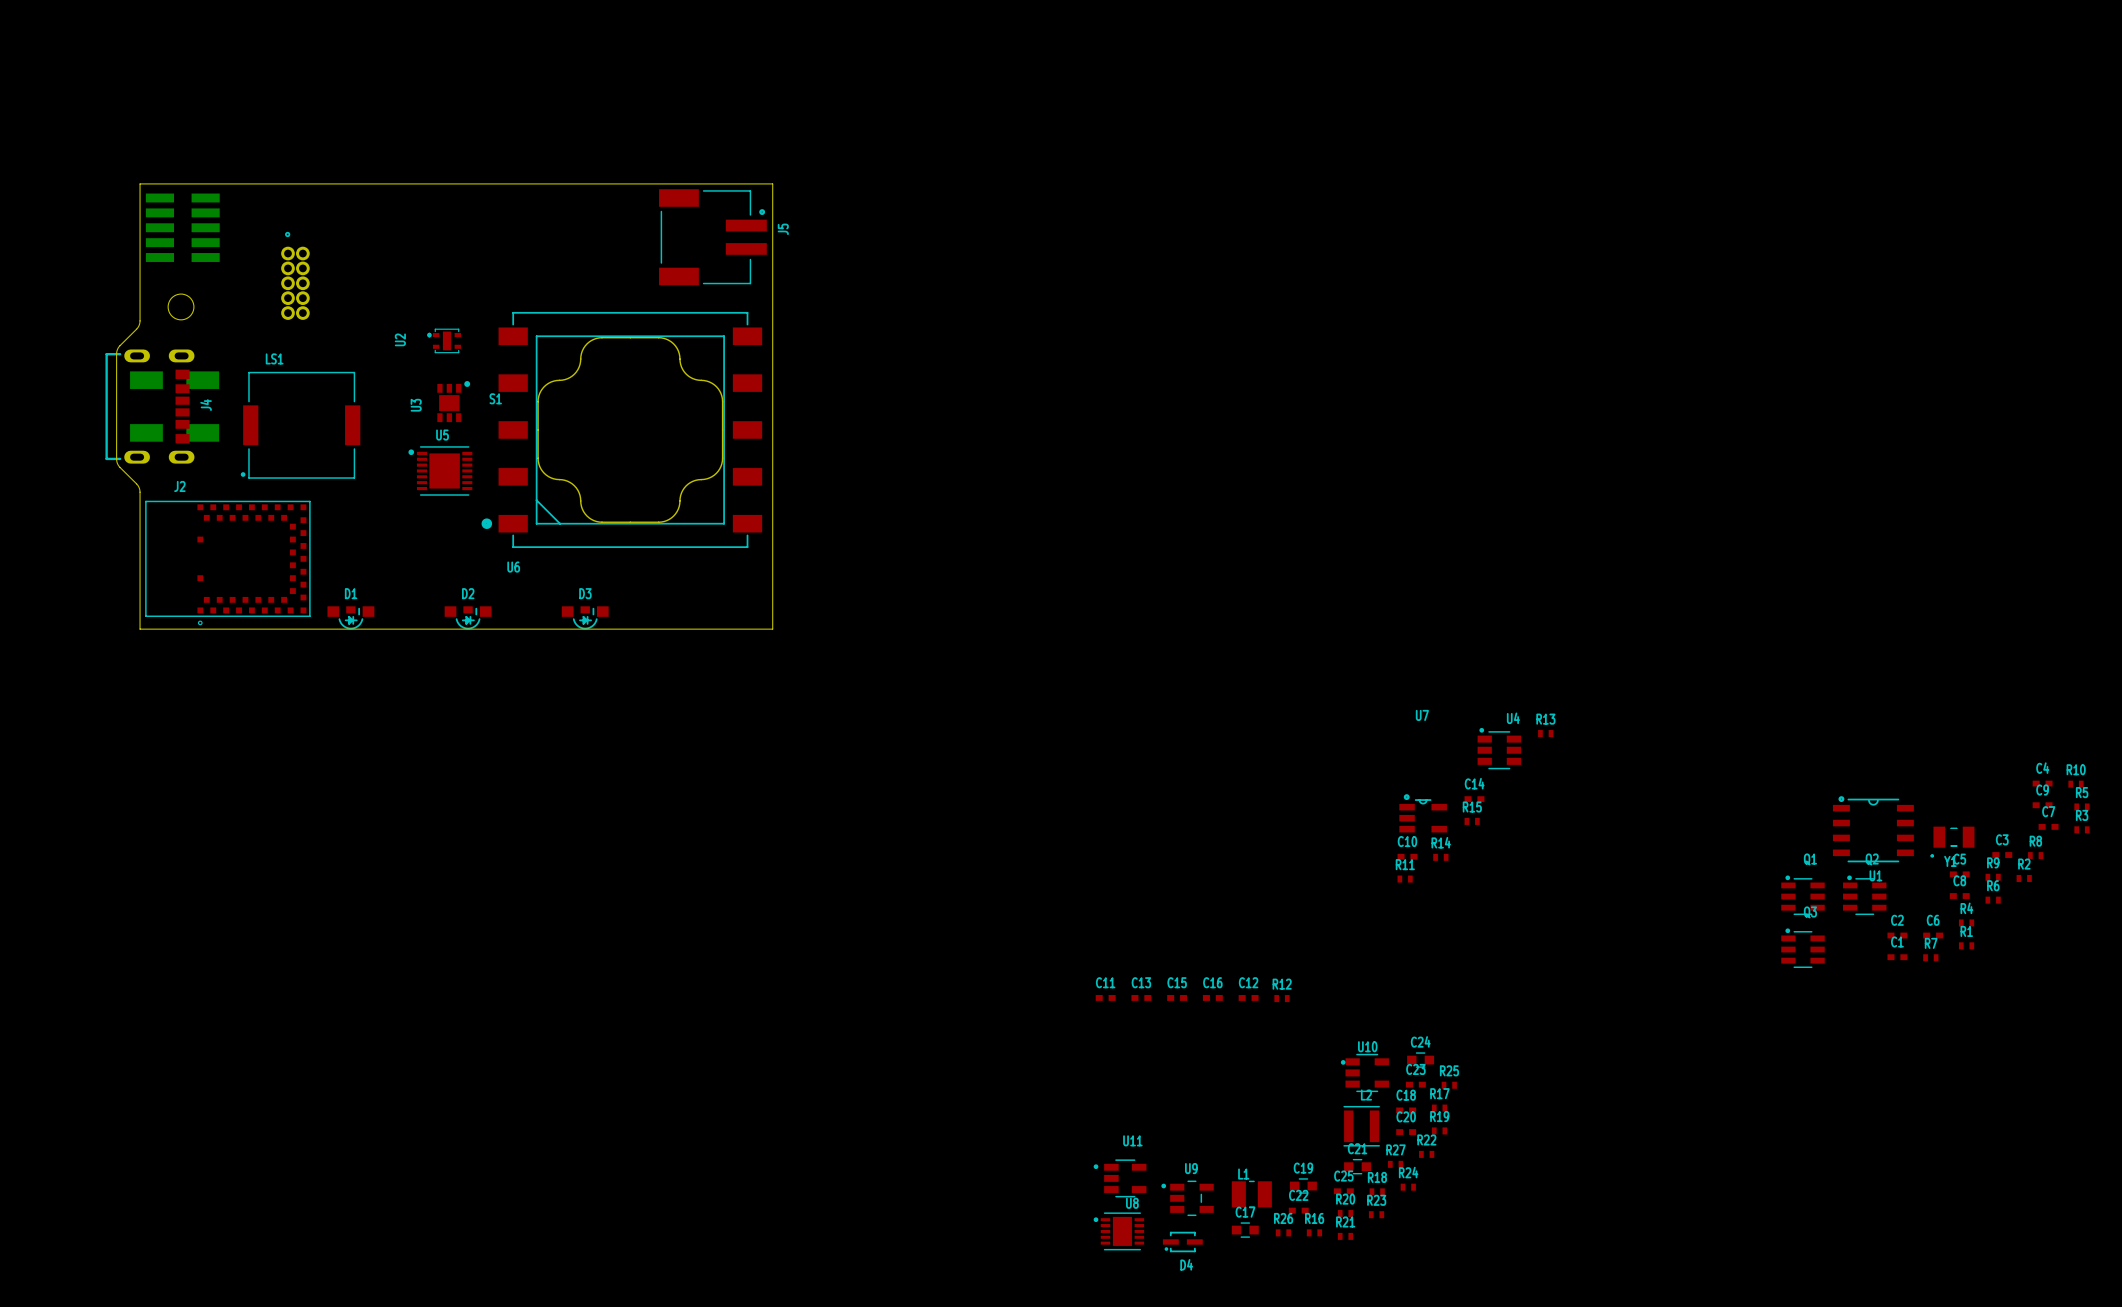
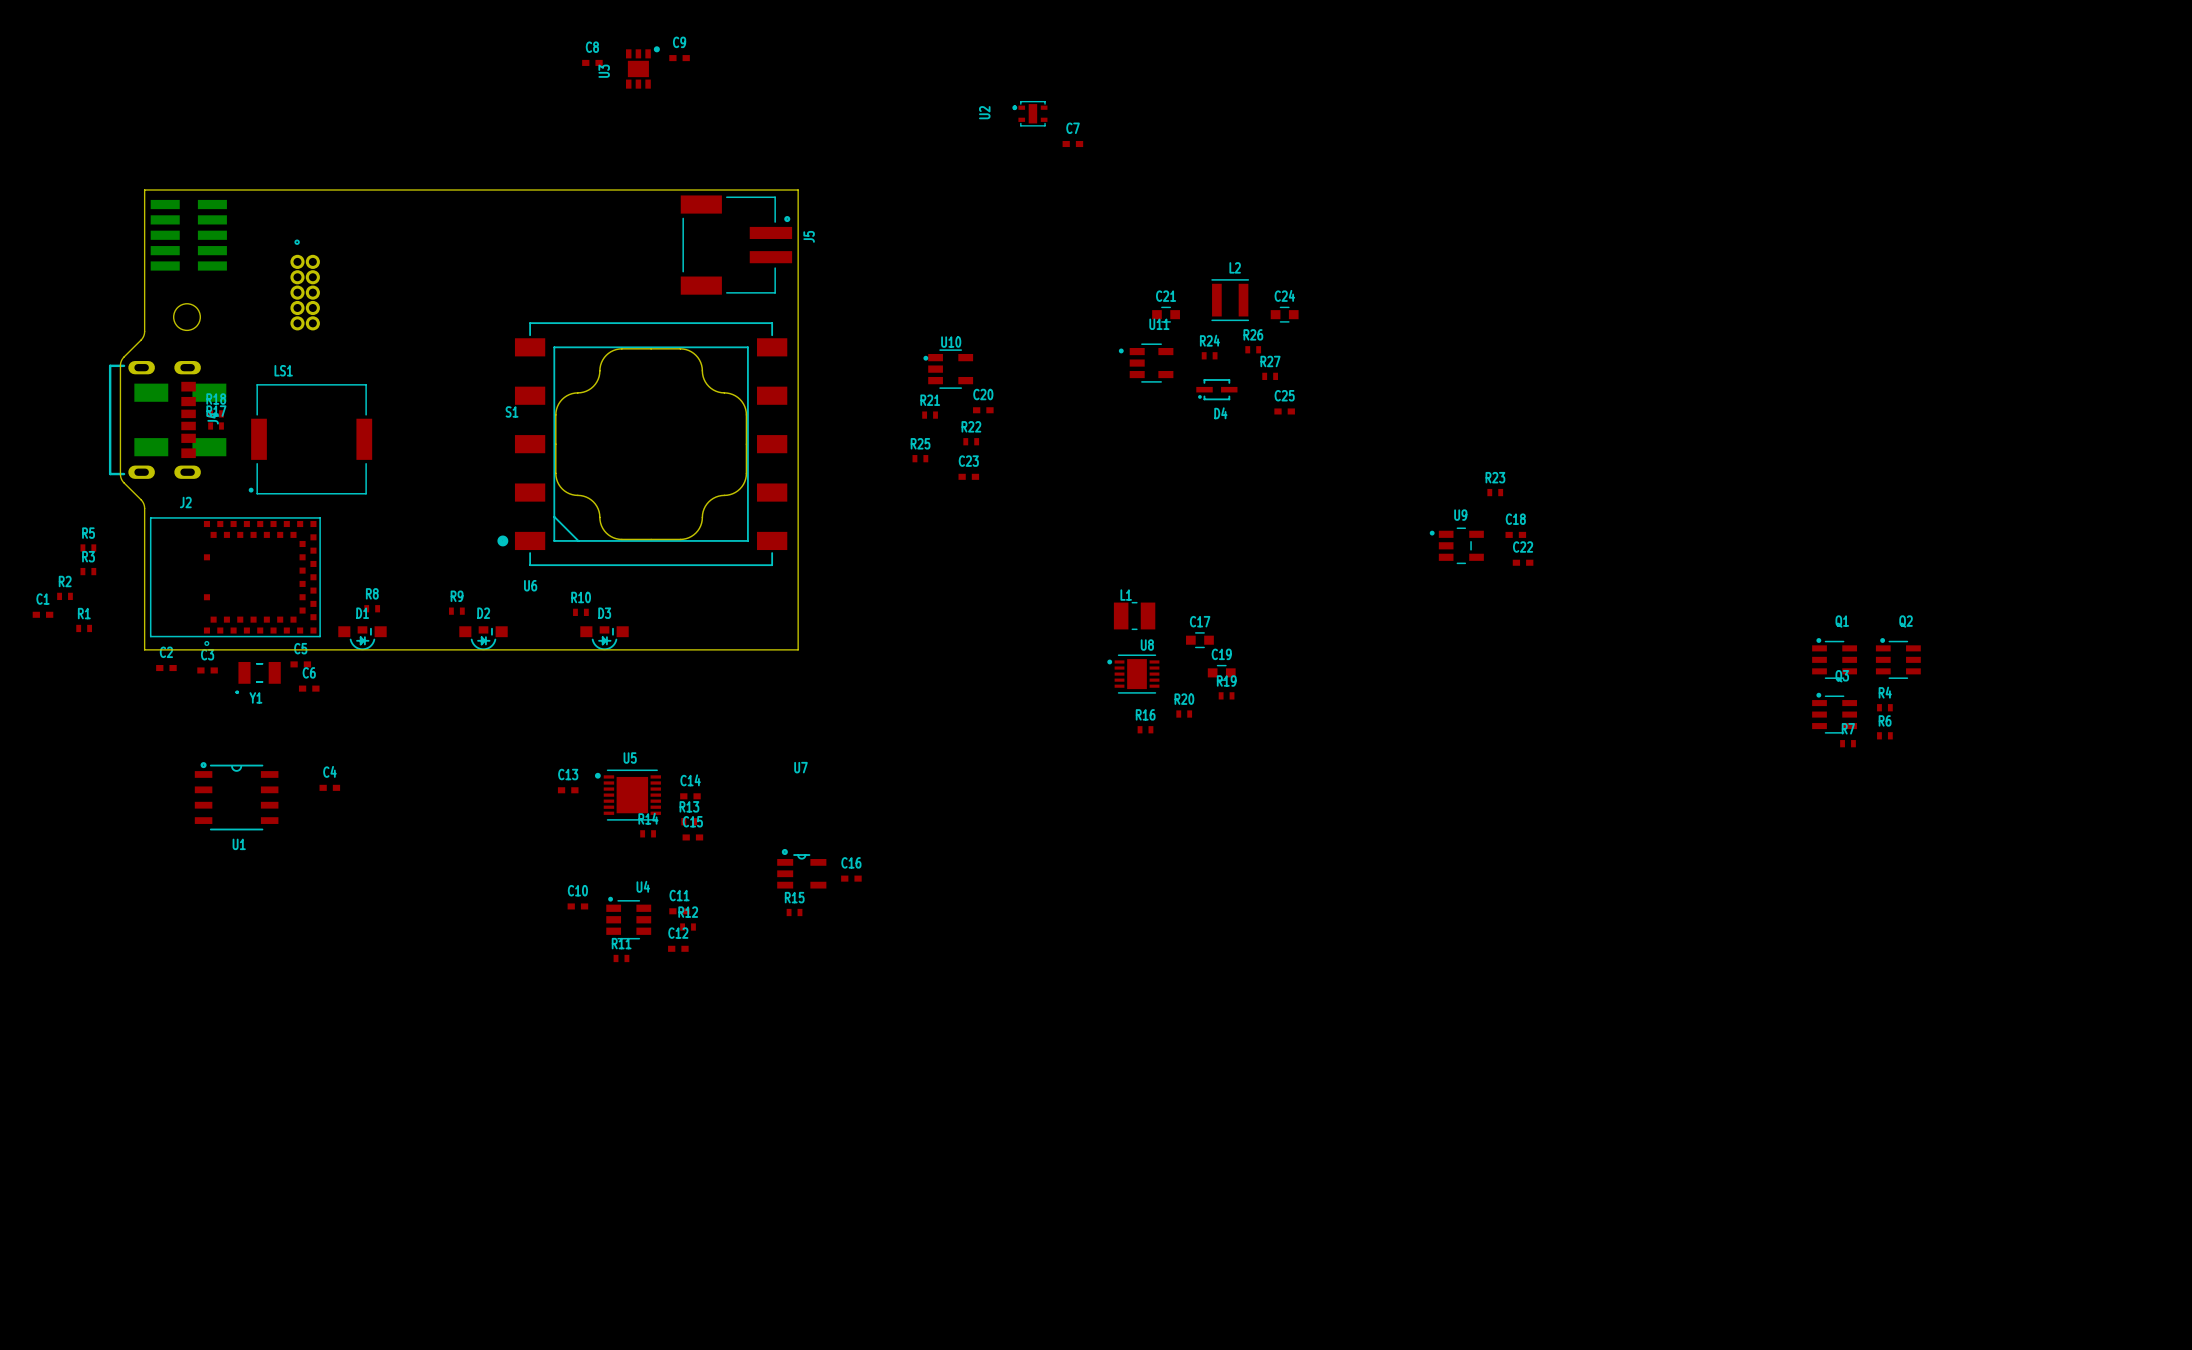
U2 position: (444, 340) -> (1029, 113)
U3 position: (453, 401) -> (642, 67)
U5 position: (440, 470) -> (627, 795)
R13 position: (1545, 733) -> (689, 821)
U4 position: (1499, 748) -> (628, 918)
C4 position: (2042, 783) -> (329, 787)
R10 position: (2075, 784) -> (580, 612)
C14 position: (1474, 799) -> (690, 796)
C9 position: (2042, 805) -> (679, 58)
R5 position: (2081, 806) -> (88, 547)
U7 position: (1423, 813) -> (801, 868)
R15 position: (1472, 821) -> (794, 912)
C7 position: (2048, 826) -> (1072, 144)
U1 position: (1873, 829) -> (236, 796)
R3 position: (2081, 829) -> (88, 571)
Y1 position: (1952, 842) -> (258, 678)
C3 position: (2002, 855) -> (207, 670)
R8 position: (2035, 855) -> (372, 608)
C10 position: (1407, 856) -> (577, 906)
R14 position: (1440, 857) -> (648, 833)
C5 position: (1959, 874) -> (300, 664)
R9 position: (1993, 877) -> (456, 611)
R2 position: (2024, 878) -> (65, 596)
R11 position: (1405, 879) -> (621, 958)
Q1 position: (1803, 895) -> (1834, 658)
Q2 position: (1864, 895) -> (1898, 658)
C8 position: (1959, 896) -> (592, 62)
R6 position: (1993, 900) -> (1884, 735)
R4 position: (1966, 922) -> (1884, 707)
C2 position: (1897, 935) -> (166, 668)
C6 position: (1933, 935) -> (309, 688)
R1 position: (1966, 945) -> (84, 628)
Q3 position: (1803, 948) -> (1834, 713)
C1 position: (1897, 957) -> (42, 614)
R7 position: (1930, 957) -> (1848, 743)
C11 position: (1105, 997) -> (679, 911)
C13 position: (1141, 997) -> (568, 790)
C15 position: (1177, 997) -> (692, 837)
C16 position: (1212, 997) -> (851, 878)
C12 position: (1248, 997) -> (678, 948)
R12 position: (1281, 998) -> (688, 927)
C24 position: (1420, 1060) -> (1284, 314)
U10 position: (1364, 1072) -> (948, 369)
C23 position: (1415, 1084) -> (968, 476)
R25 position: (1449, 1085) -> (920, 458)
R17 position: (1439, 1108) -> (216, 425)
C18 position: (1406, 1110) -> (1515, 534)
L2 position: (1361, 1126) -> (1230, 300)
R19 position: (1439, 1130) -> (1226, 695)
C20 position: (1406, 1132) -> (983, 410)
R22 position: (1426, 1154) -> (971, 441)
R27 position: (1395, 1164) -> (1270, 376)
C21 position: (1357, 1166) -> (1166, 314)
U11 position: (1120, 1178) -> (1146, 363)
C19 position: (1303, 1186) -> (1221, 672)
R24 position: (1408, 1187) -> (1209, 355)
C25 position: (1343, 1191) -> (1284, 411)
R18 position: (1377, 1191) -> (216, 413)
L1 position: (1251, 1194) -> (1134, 615)
U9 position: (1187, 1198) -> (1456, 545)
C22 position: (1298, 1210) -> (1523, 562)
R20 position: (1345, 1213) -> (1184, 714)
R23 position: (1376, 1214) -> (1495, 492)
C17 position: (1245, 1230) -> (1199, 640)
U8 position: (1118, 1231) -> (1133, 674)
R26 position: (1283, 1232) -> (1253, 349)
R16 position: (1314, 1232) -> (1145, 729)
R21 position: (1345, 1236) -> (930, 415)
D4 position: (1182, 1241) -> (1216, 389)

